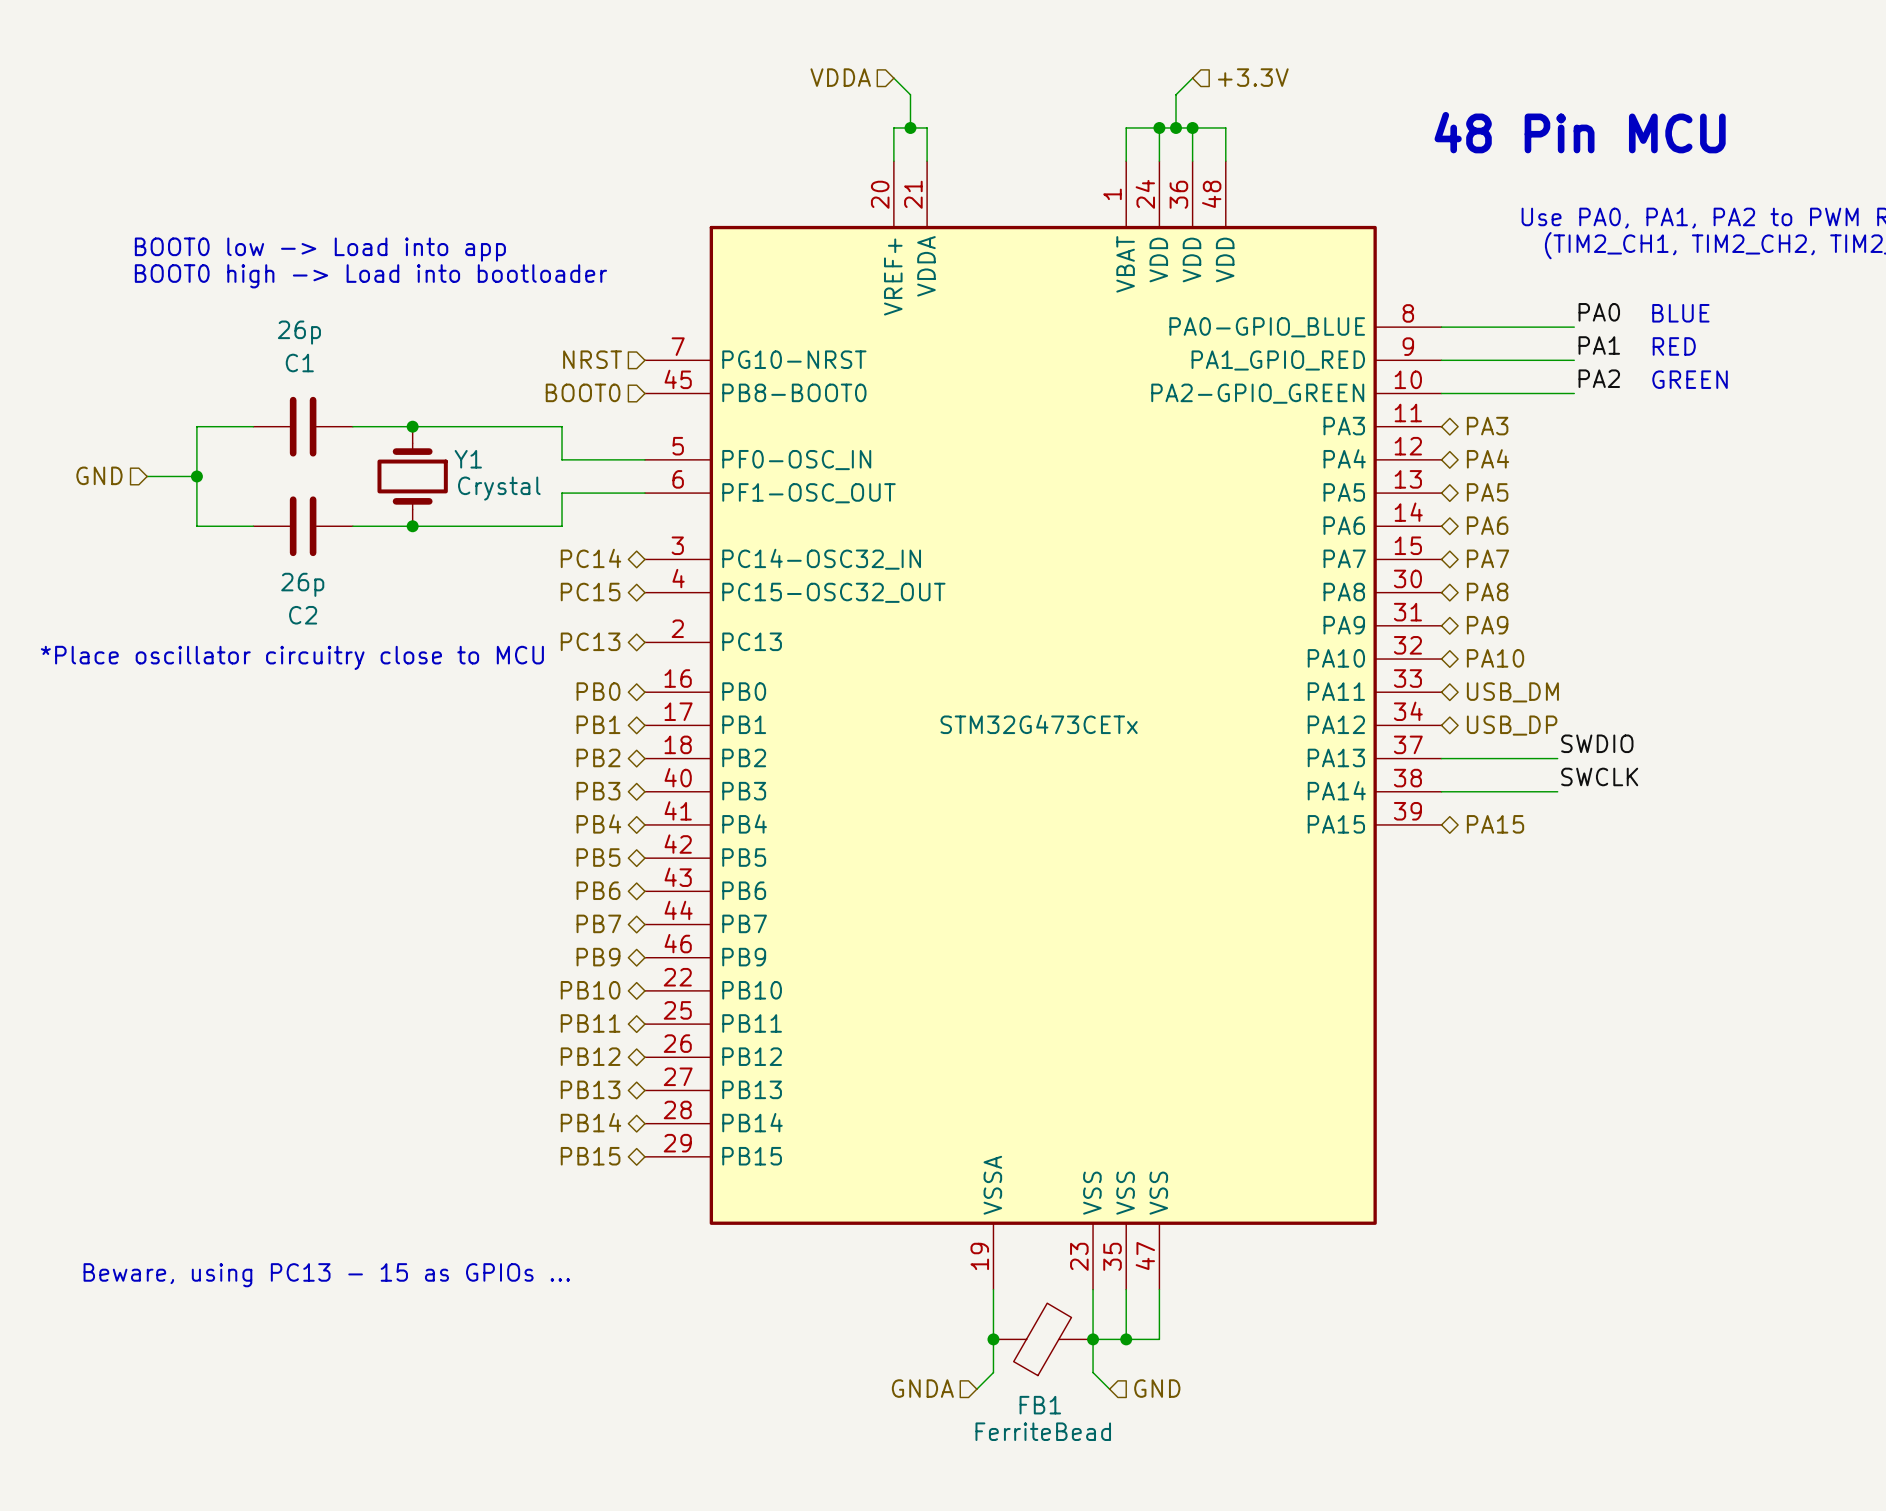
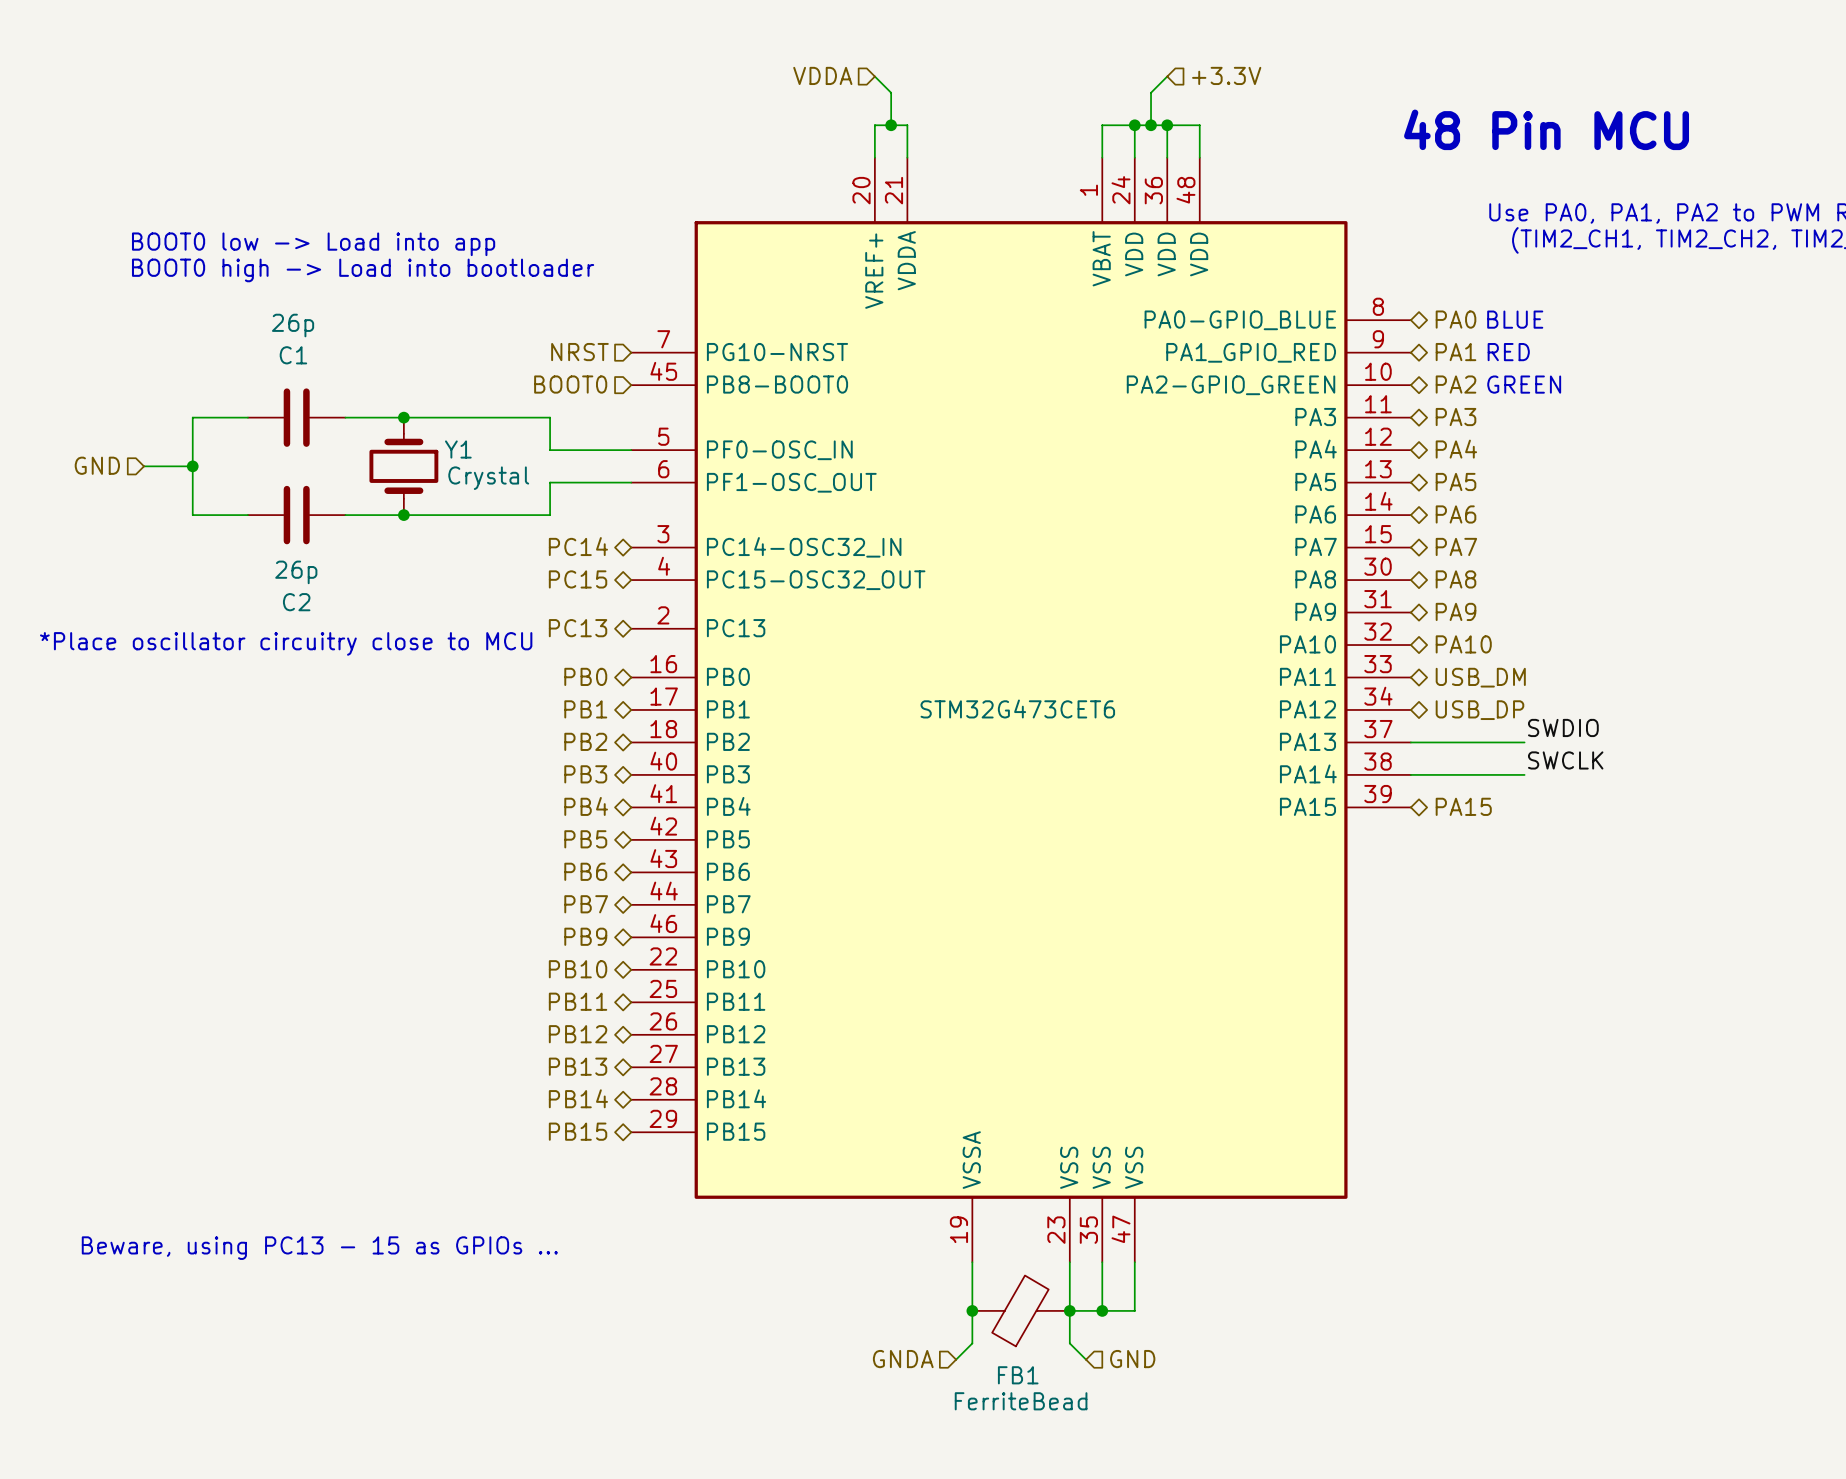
label: PA0 (1599, 312) -> none
text position: BLUE (1680, 313) -> BLUE (1515, 319)
hierarchical label: none -> PA0 (1456, 319)
wire: (1441, 327) (1574, 327) -> none
label: PA1 (1599, 345) -> none
text position: RED (1674, 346) -> RED (1508, 352)
hierarchical label: none -> PA1 (1456, 352)
wire: (1441, 360) (1574, 360) -> none
label: PA2 (1599, 378) -> none
text position: GREEN (1690, 379) -> GREEN (1524, 384)
hierarchical label: none -> PA2 (1456, 384)
wire: (1441, 393) (1574, 393) -> none
part value: STM32G473CETx (1039, 724) -> STM32G473CET6 (1017, 708)

